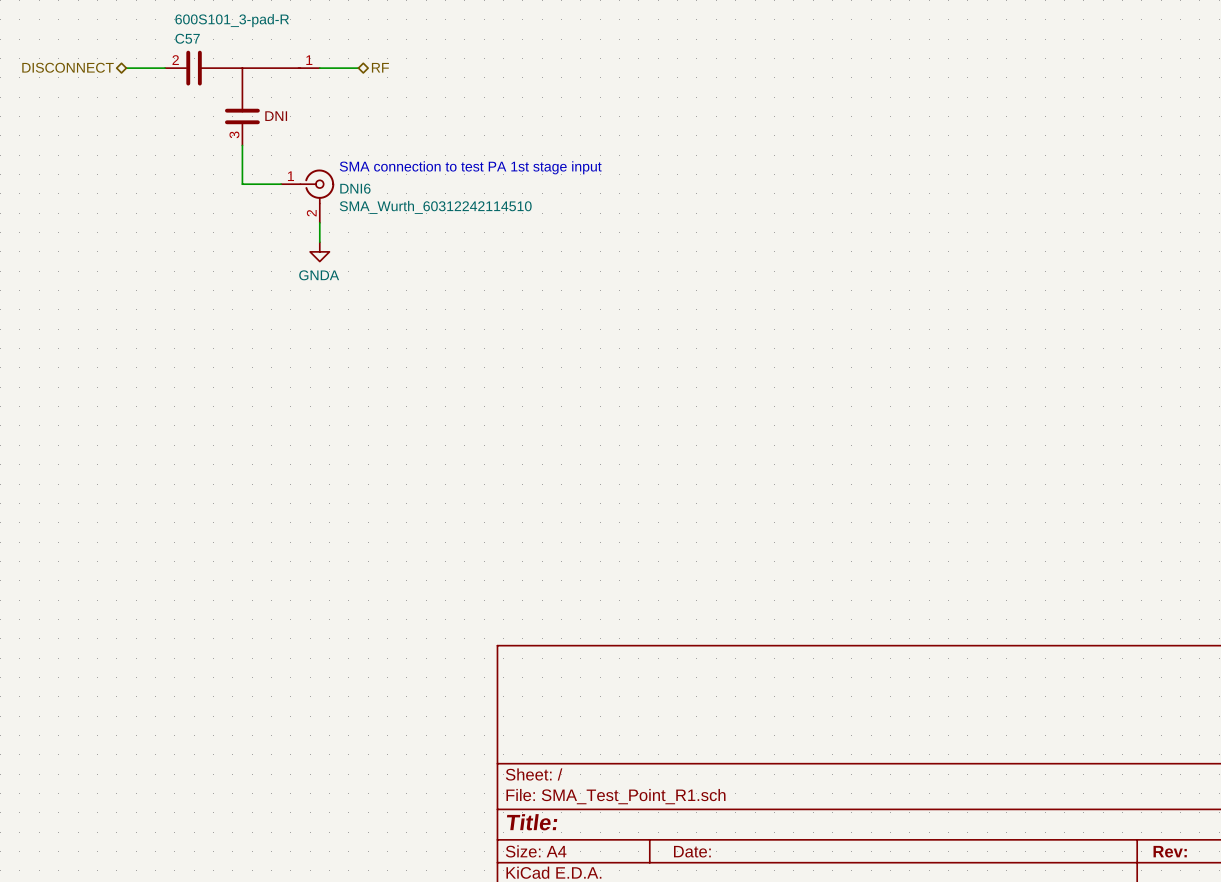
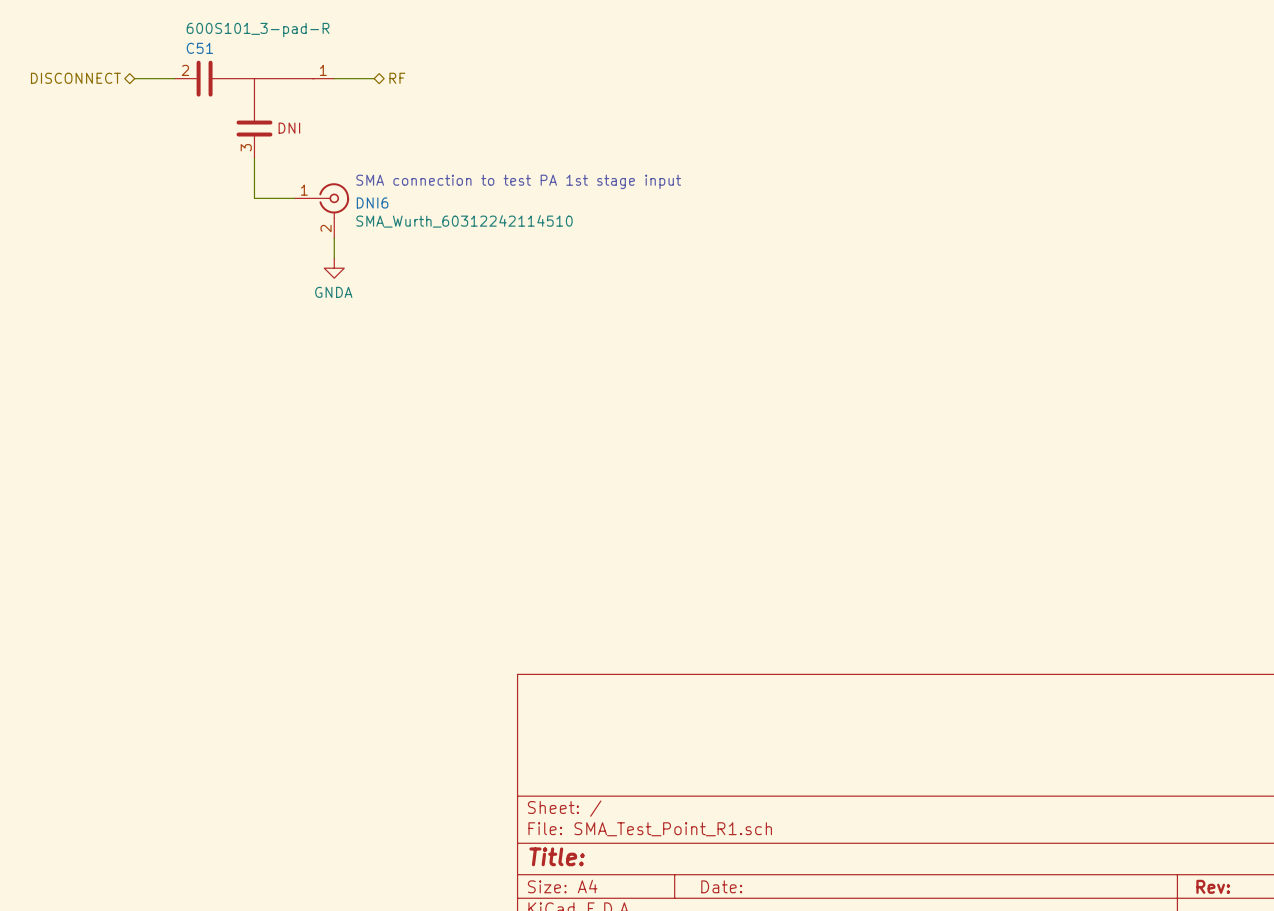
C57 name: C57 (187, 38) -> C51 (199, 48)

